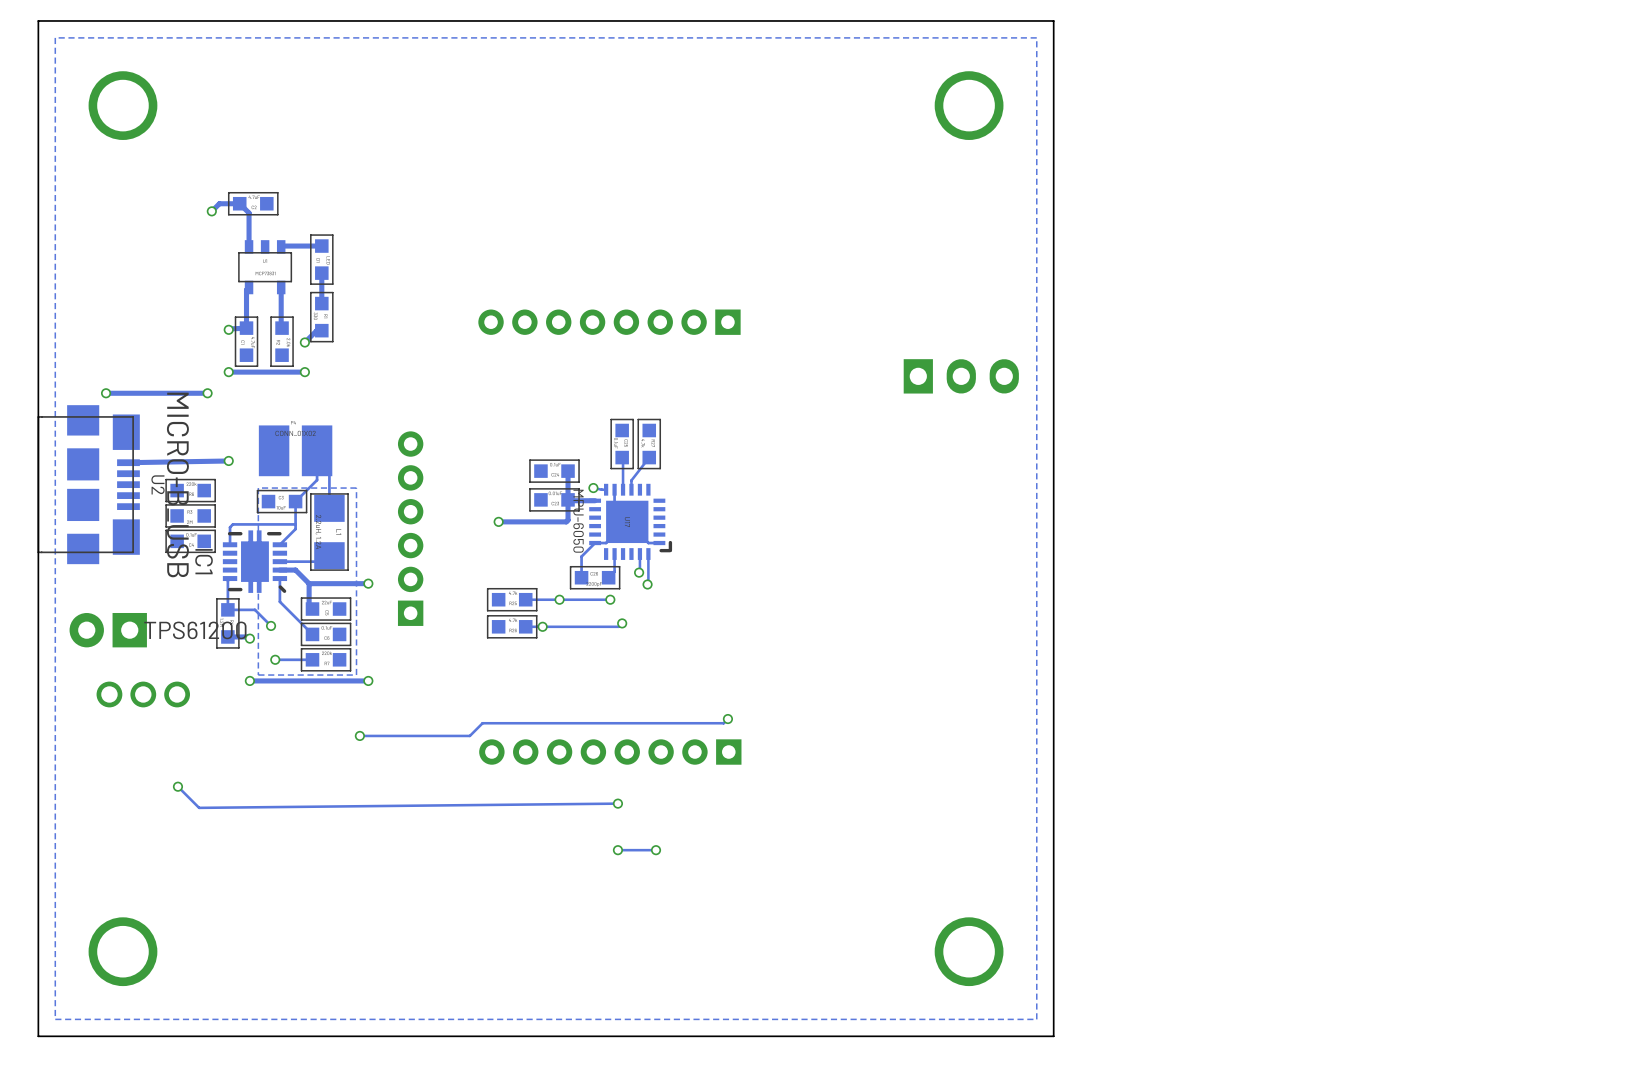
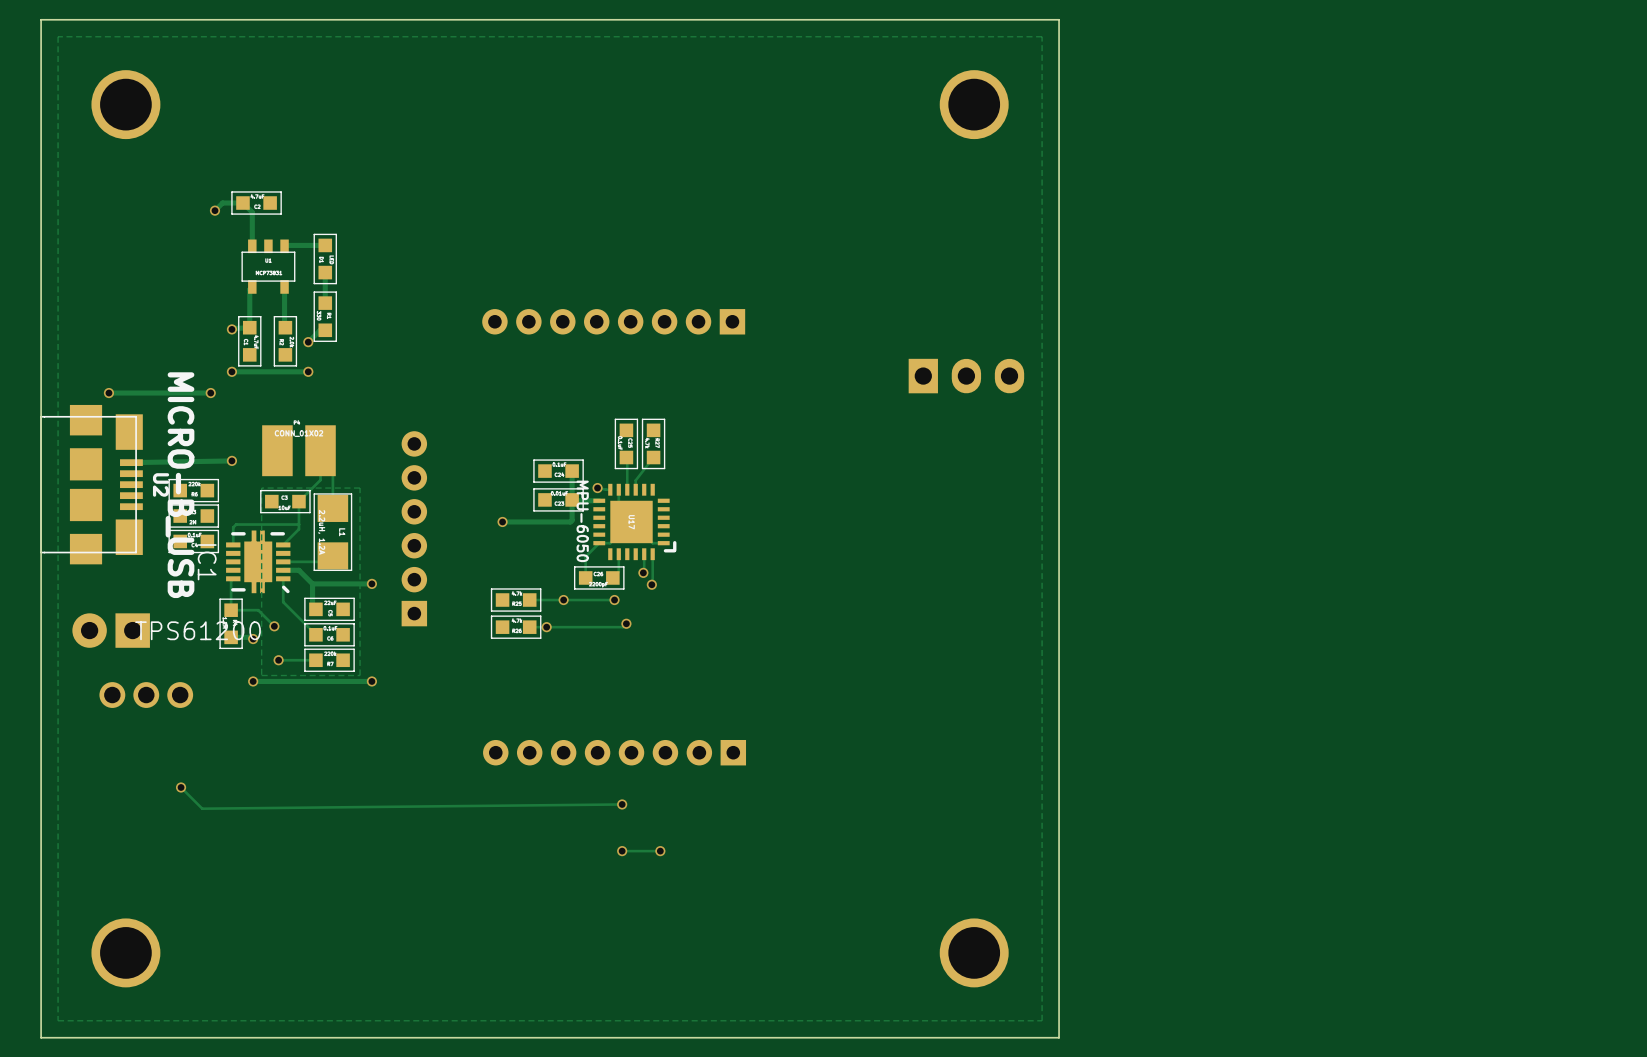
track: (727, 719) (723, 723) (482, 723) (469, 735) (359, 735) -> none
via: (727, 719) -> none
via: (359, 735) -> none

